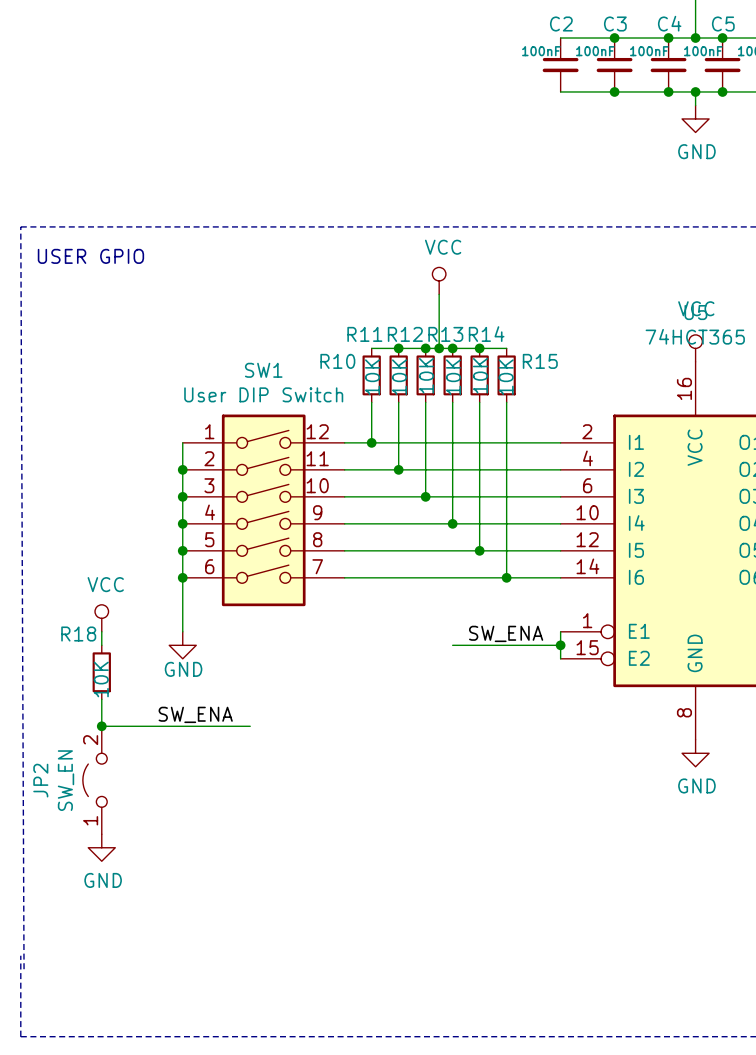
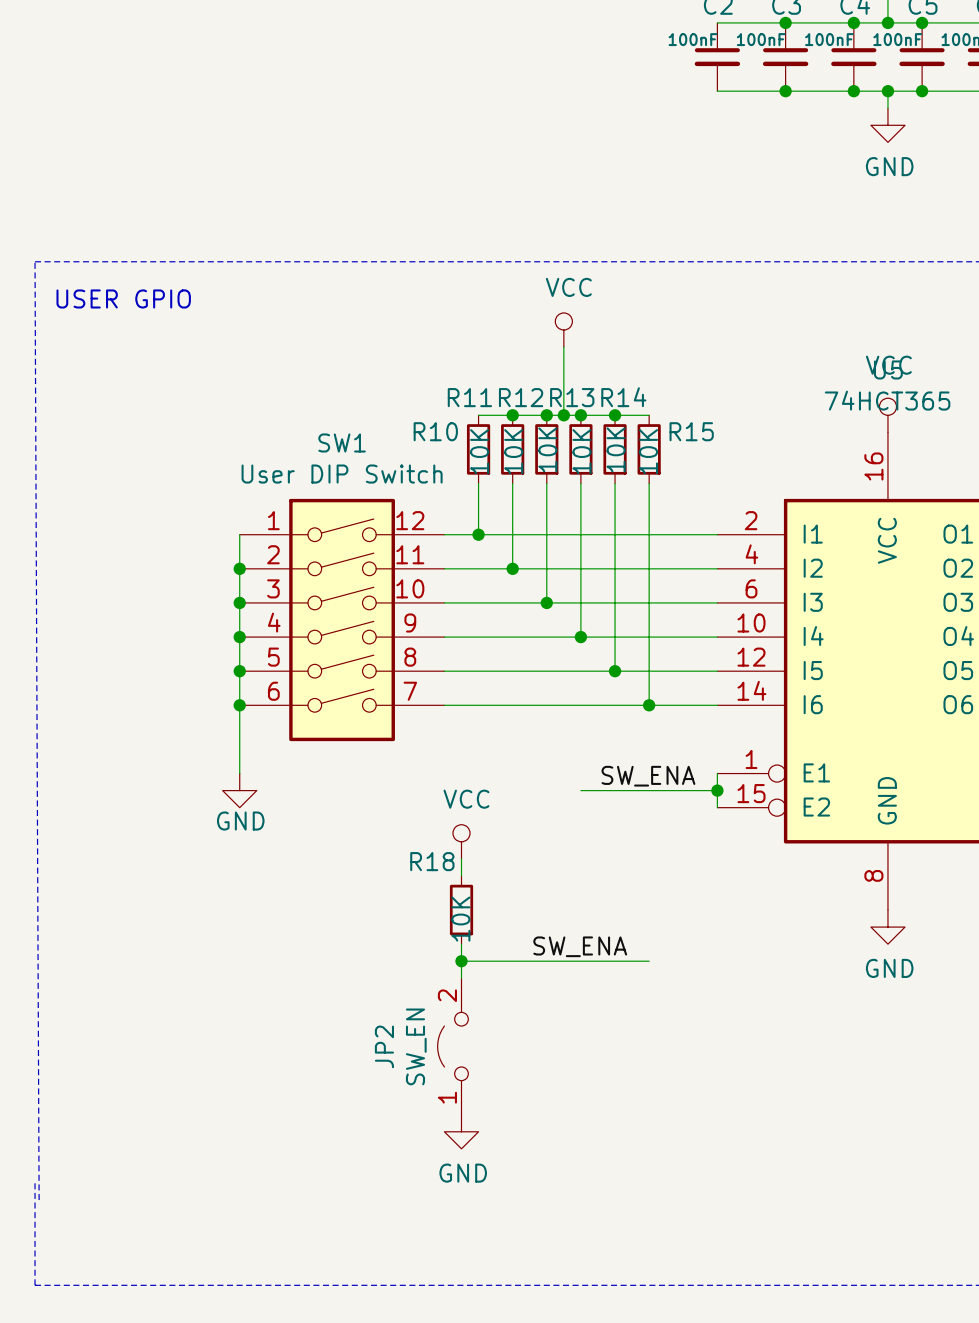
power symbol position: VCC (101, 618) -> VCC (461, 841)
wire: (101, 631) (101, 645) -> (461, 858) (461, 875)
R18 position: (101, 672) -> (461, 910)
wire: (101, 699) (101, 726) (250, 726) -> none
label position: SW_ENA (195, 714) -> SW_ENA (580, 946)
junction: (101, 726) -> none
wire: none -> (461, 944) (461, 978)
JP2 position: (95, 780) -> (452, 1046)
wire: none -> (461, 961) (649, 961)
junction: none -> (461, 961)
power symbol position: GND (101, 847) -> GND (461, 1131)

